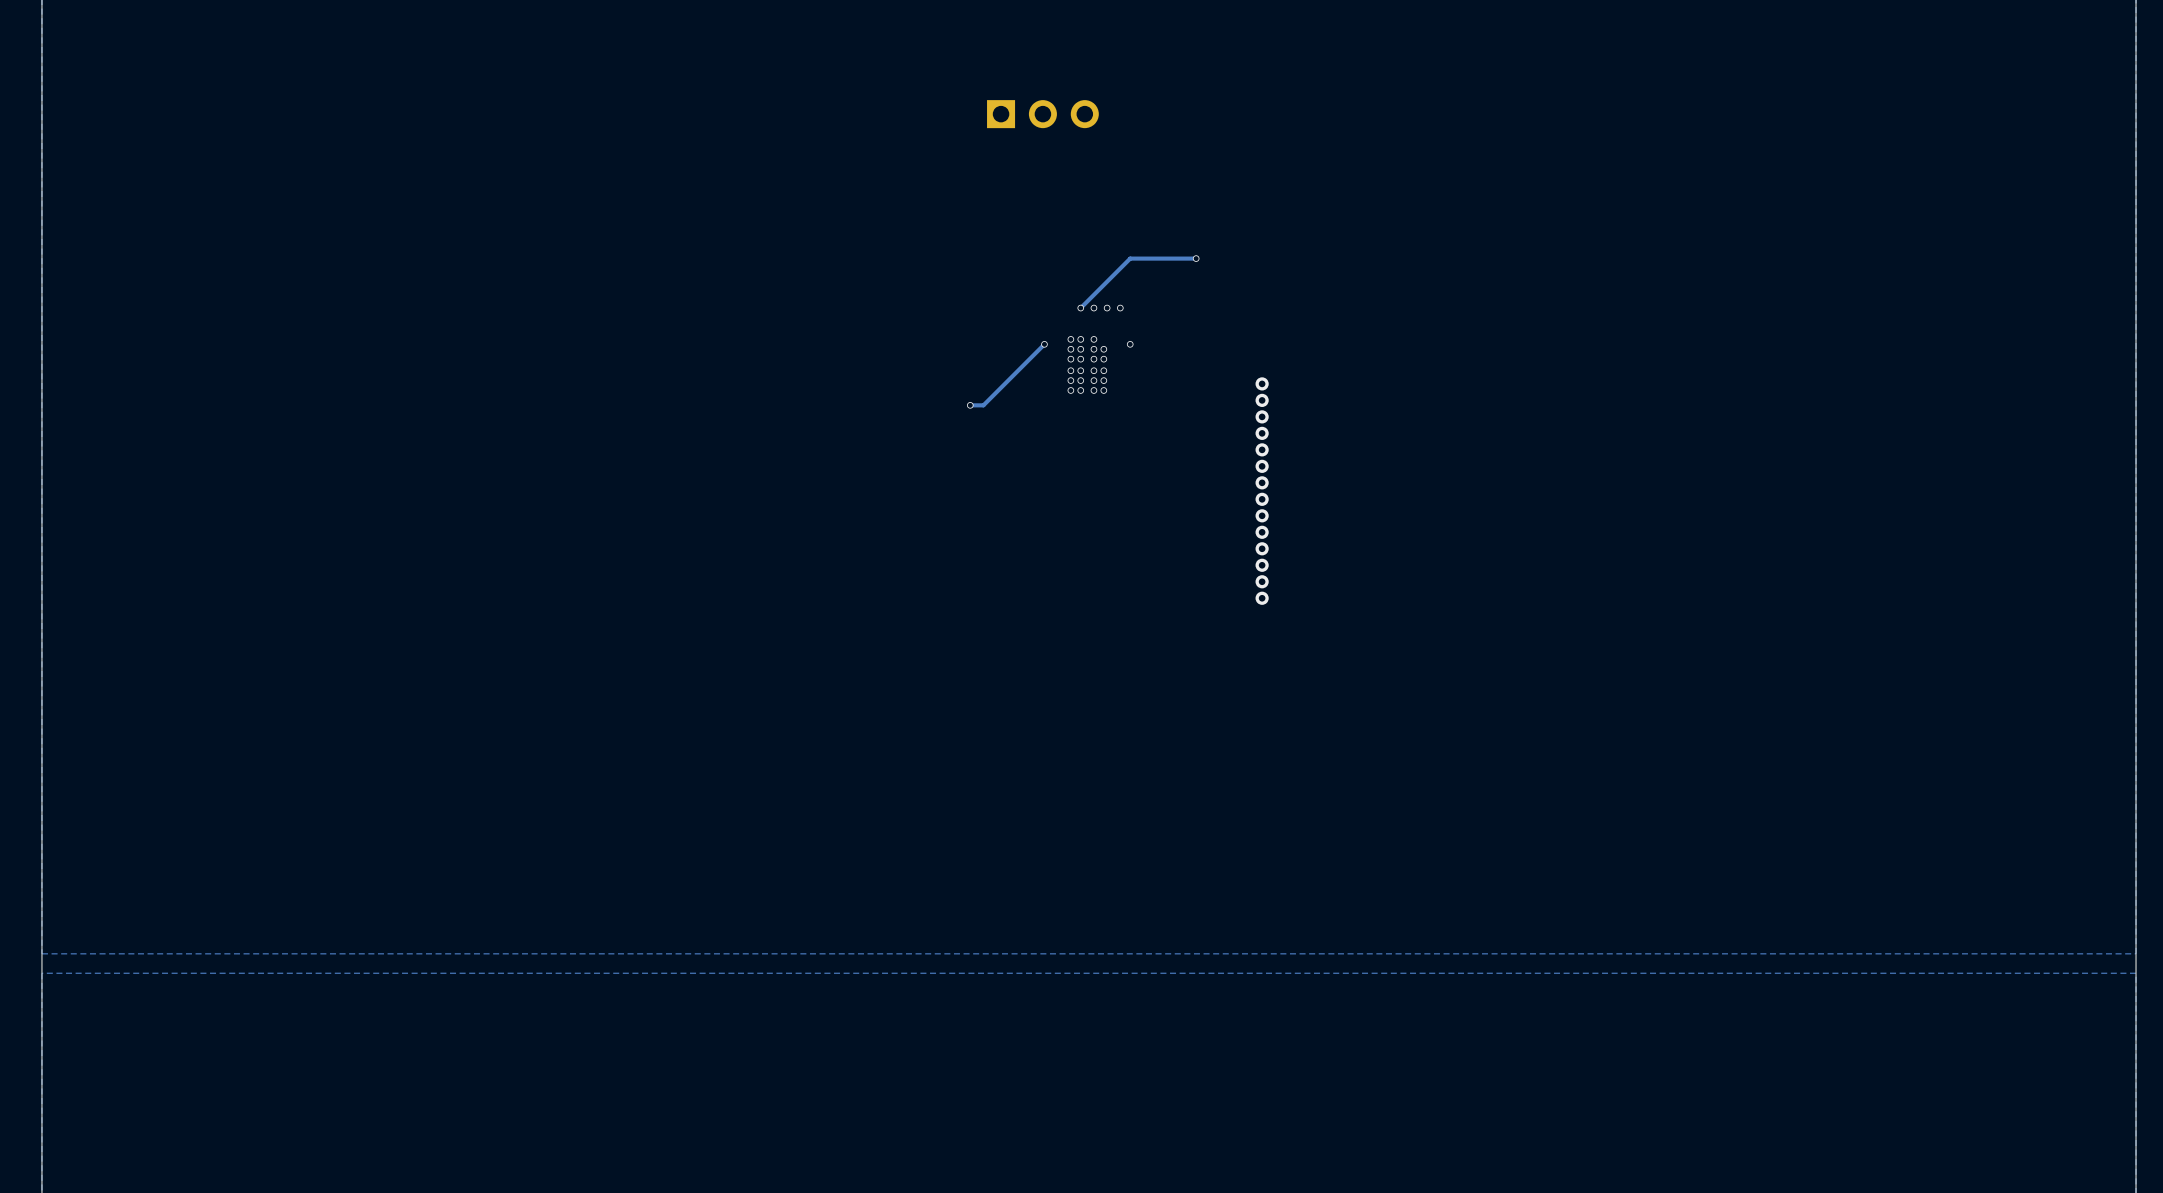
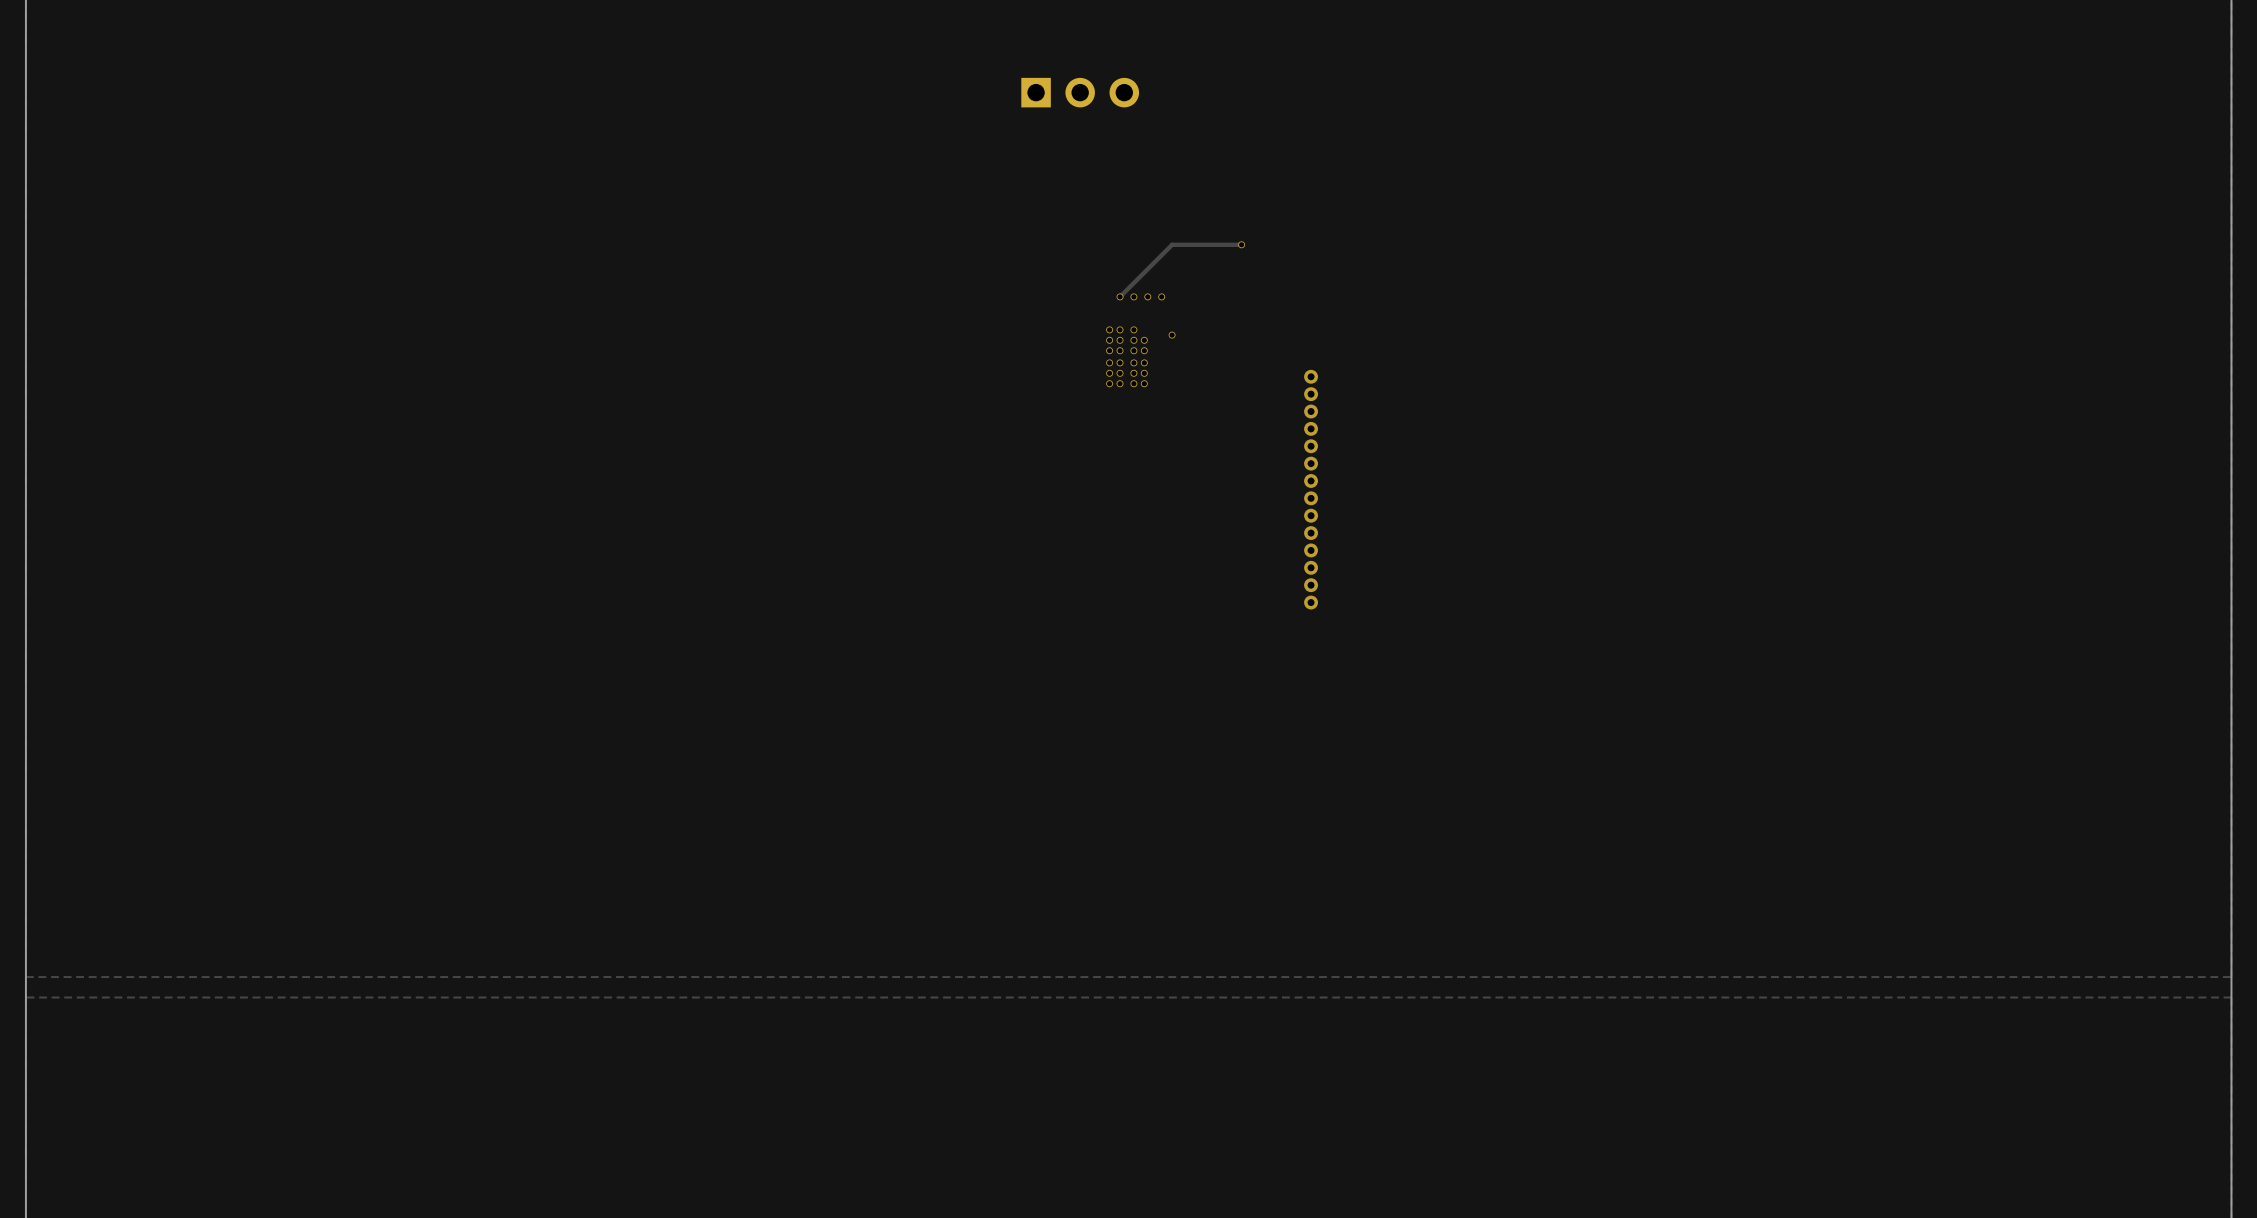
track: (1044, 344) (983, 405) (970, 405) -> none
via: (1044, 344) -> none
via: (970, 405) -> none

